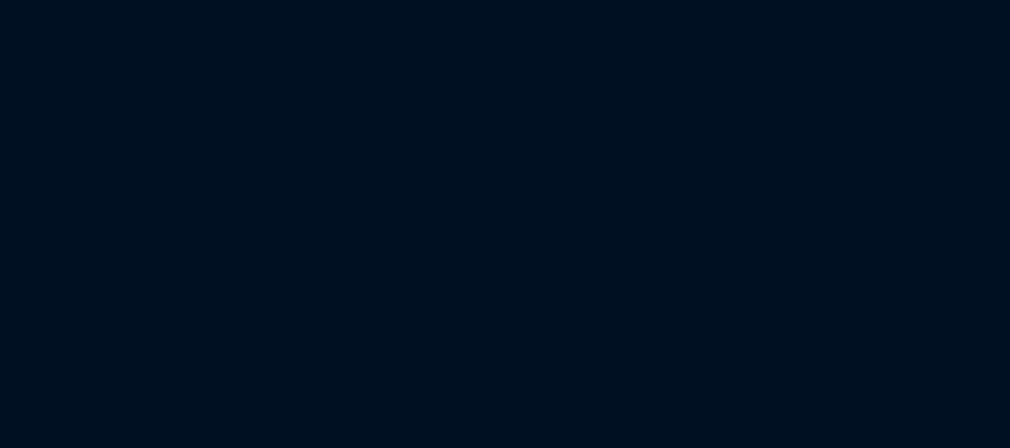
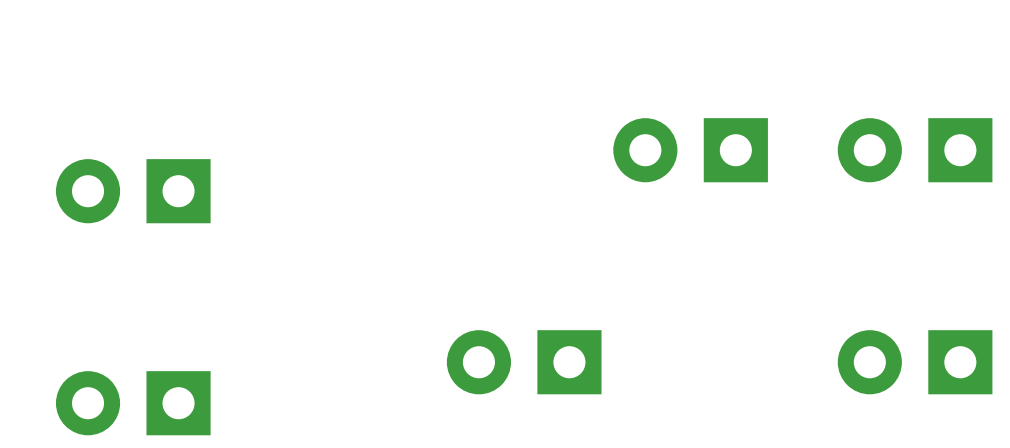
part: none -> (690, 150)
part: none -> (915, 150)
part: none -> (133, 191)
part: none -> (524, 362)
part: none -> (915, 362)
part: none -> (133, 403)

